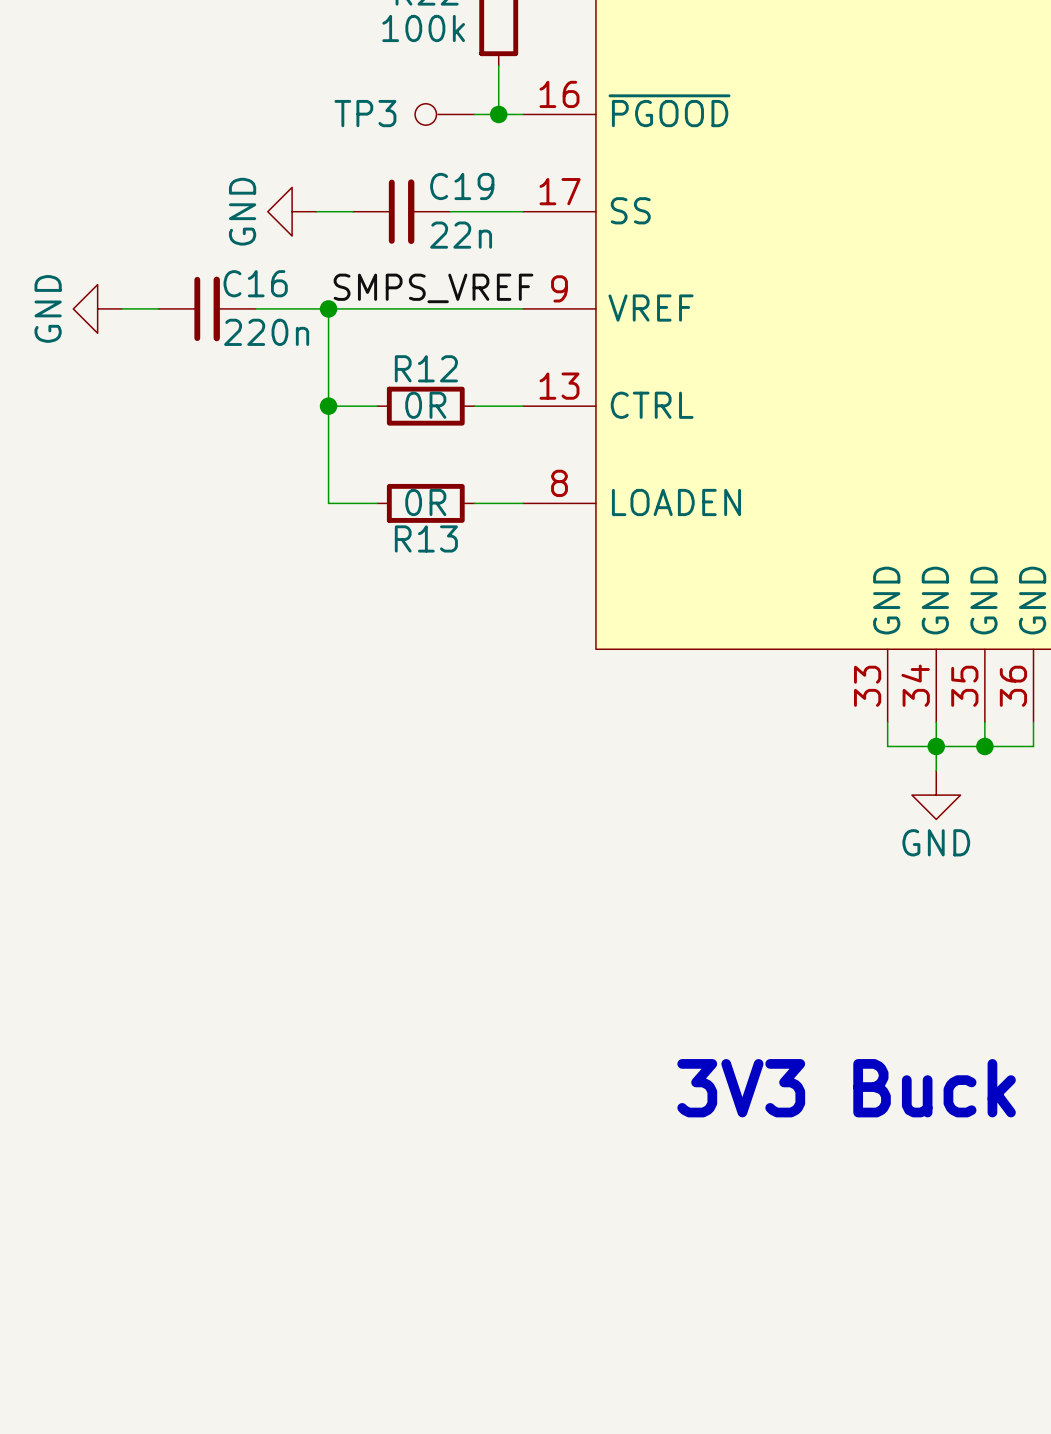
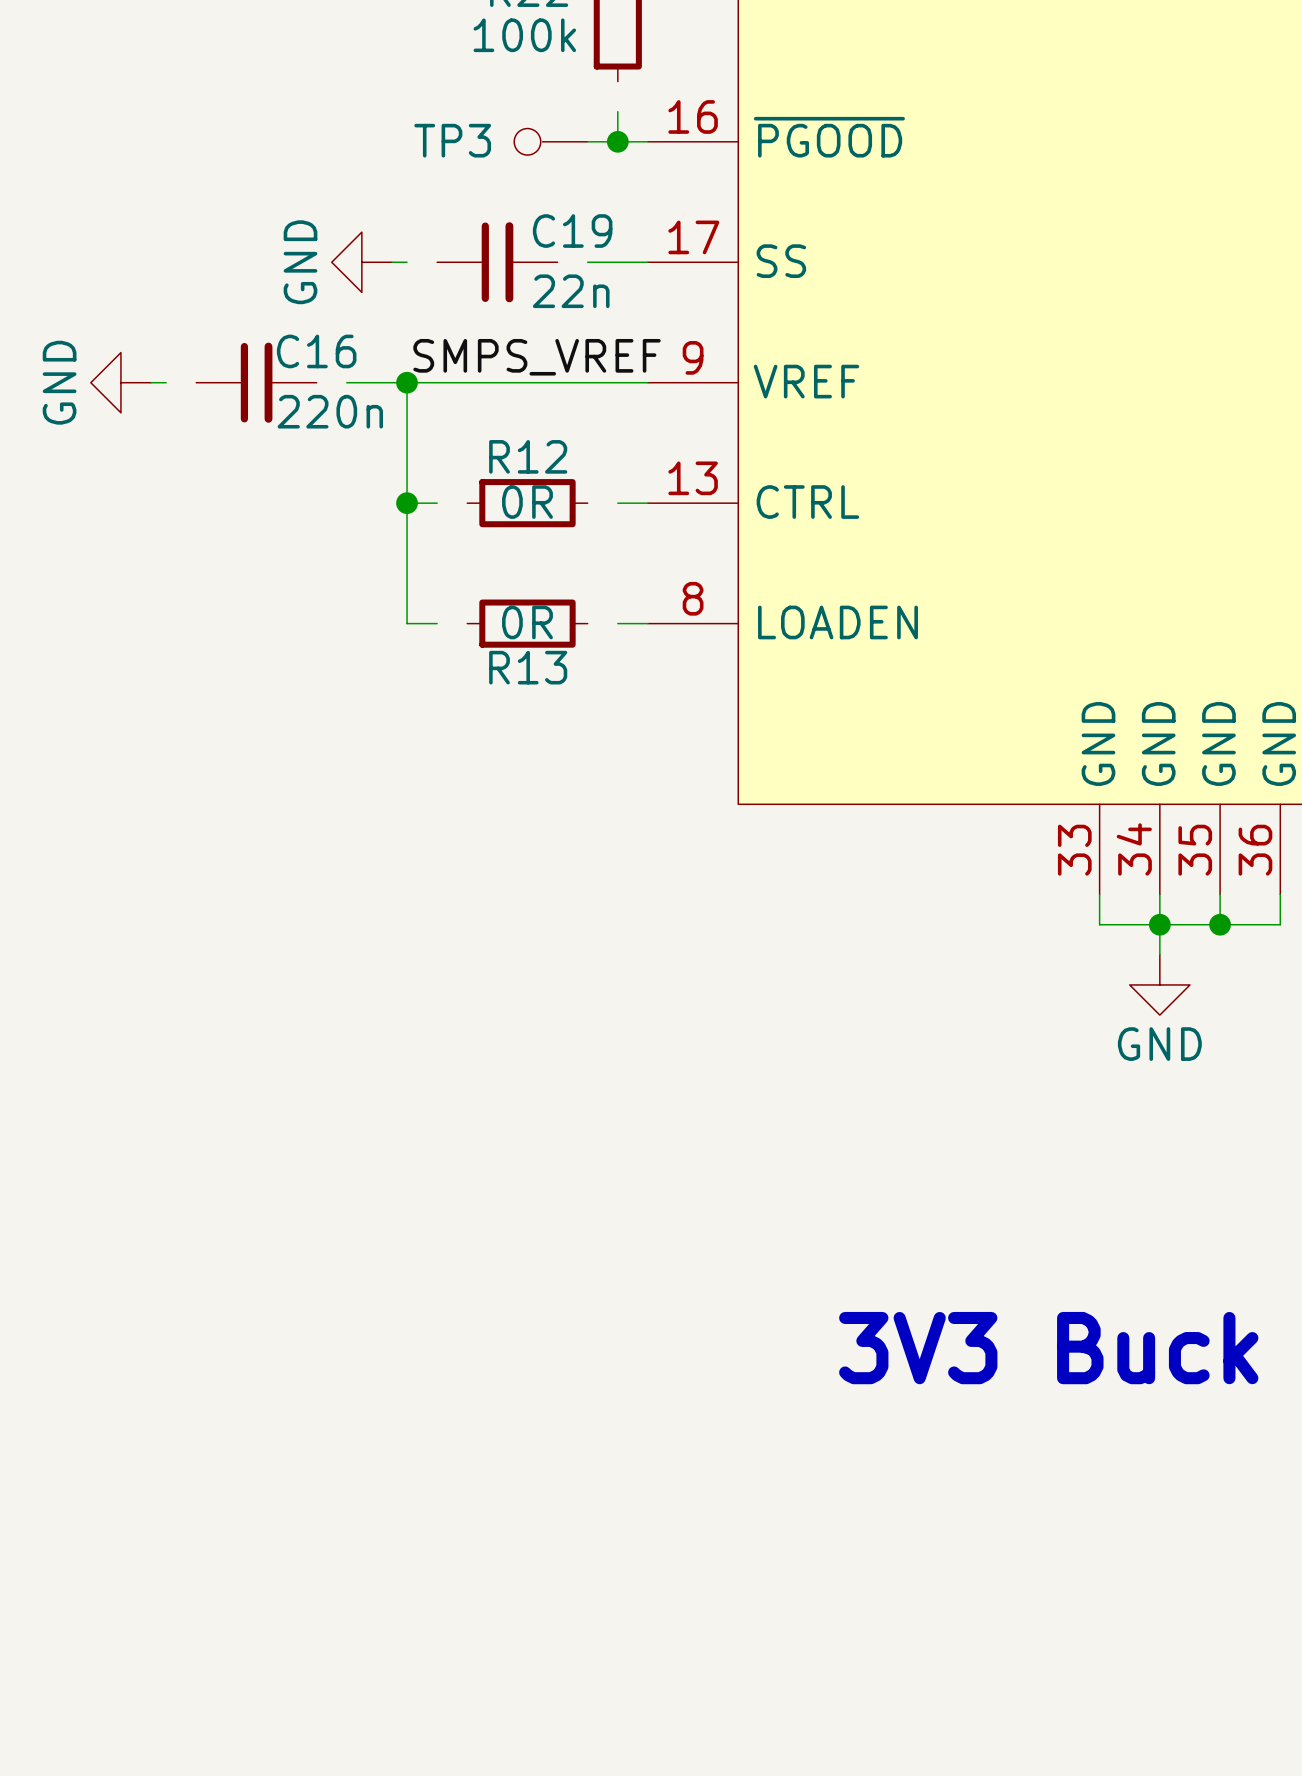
wire: (498, 65) (498, 90) -> none
wire: (328, 211) (352, 211) -> none
wire: (450, 211) (474, 211) -> none
wire: (134, 308) (158, 308) -> none
wire: (255, 308) (279, 308) -> none
wire: (352, 406) (377, 406) -> none
wire: (474, 406) (498, 406) -> none
wire: (352, 503) (377, 503) -> none
wire: (474, 503) (498, 503) -> none

